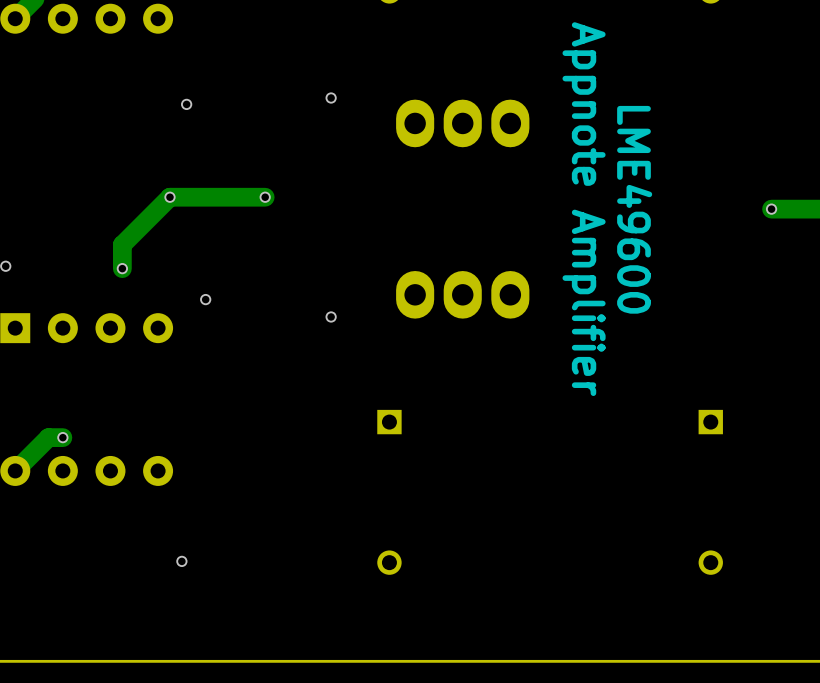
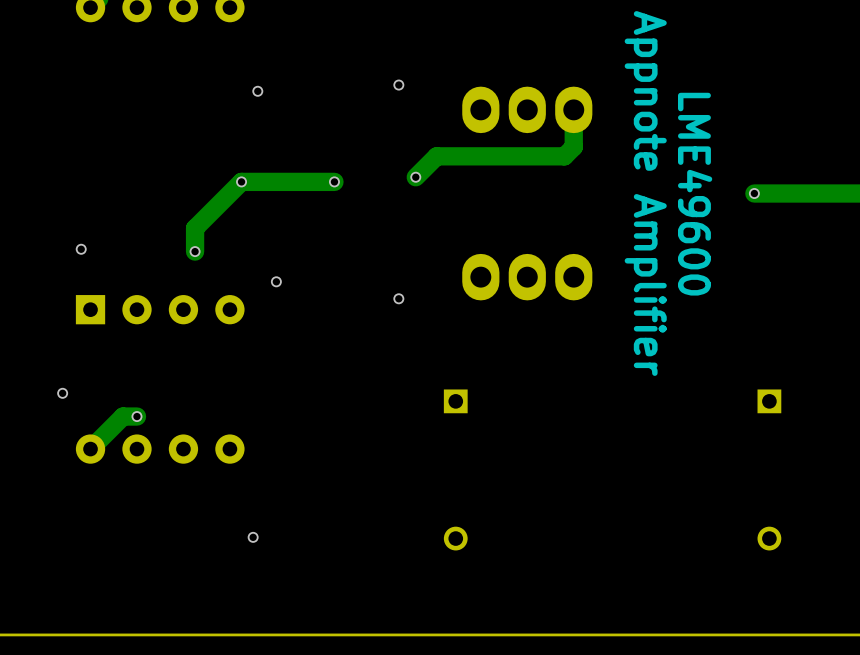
track: none -> (573, 123) (573, 147) (564, 156) (436, 156) (415, 177)
via: none -> (415, 177)
track: none -> (828, 193) (754, 193)
via position: (771, 209) -> (754, 193)

